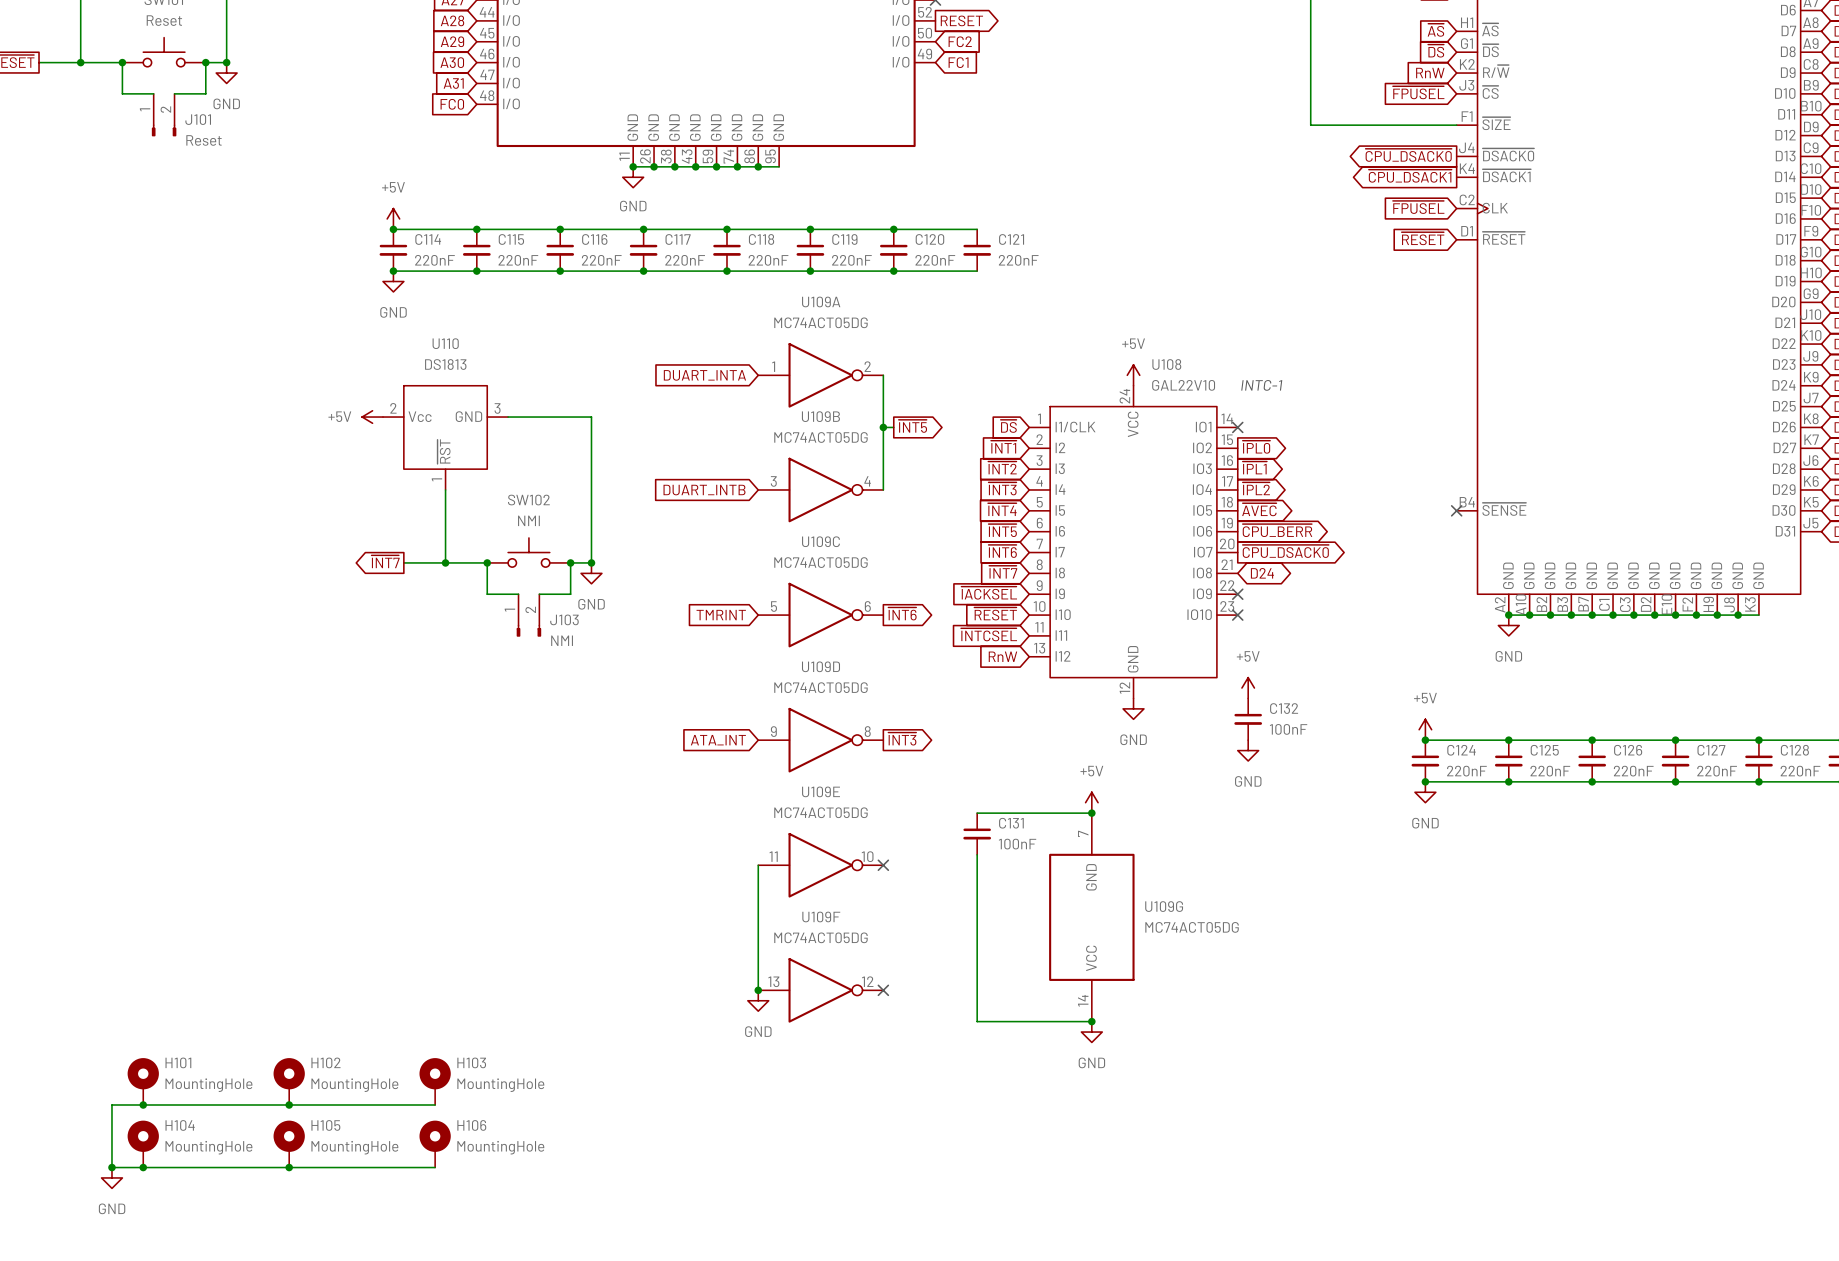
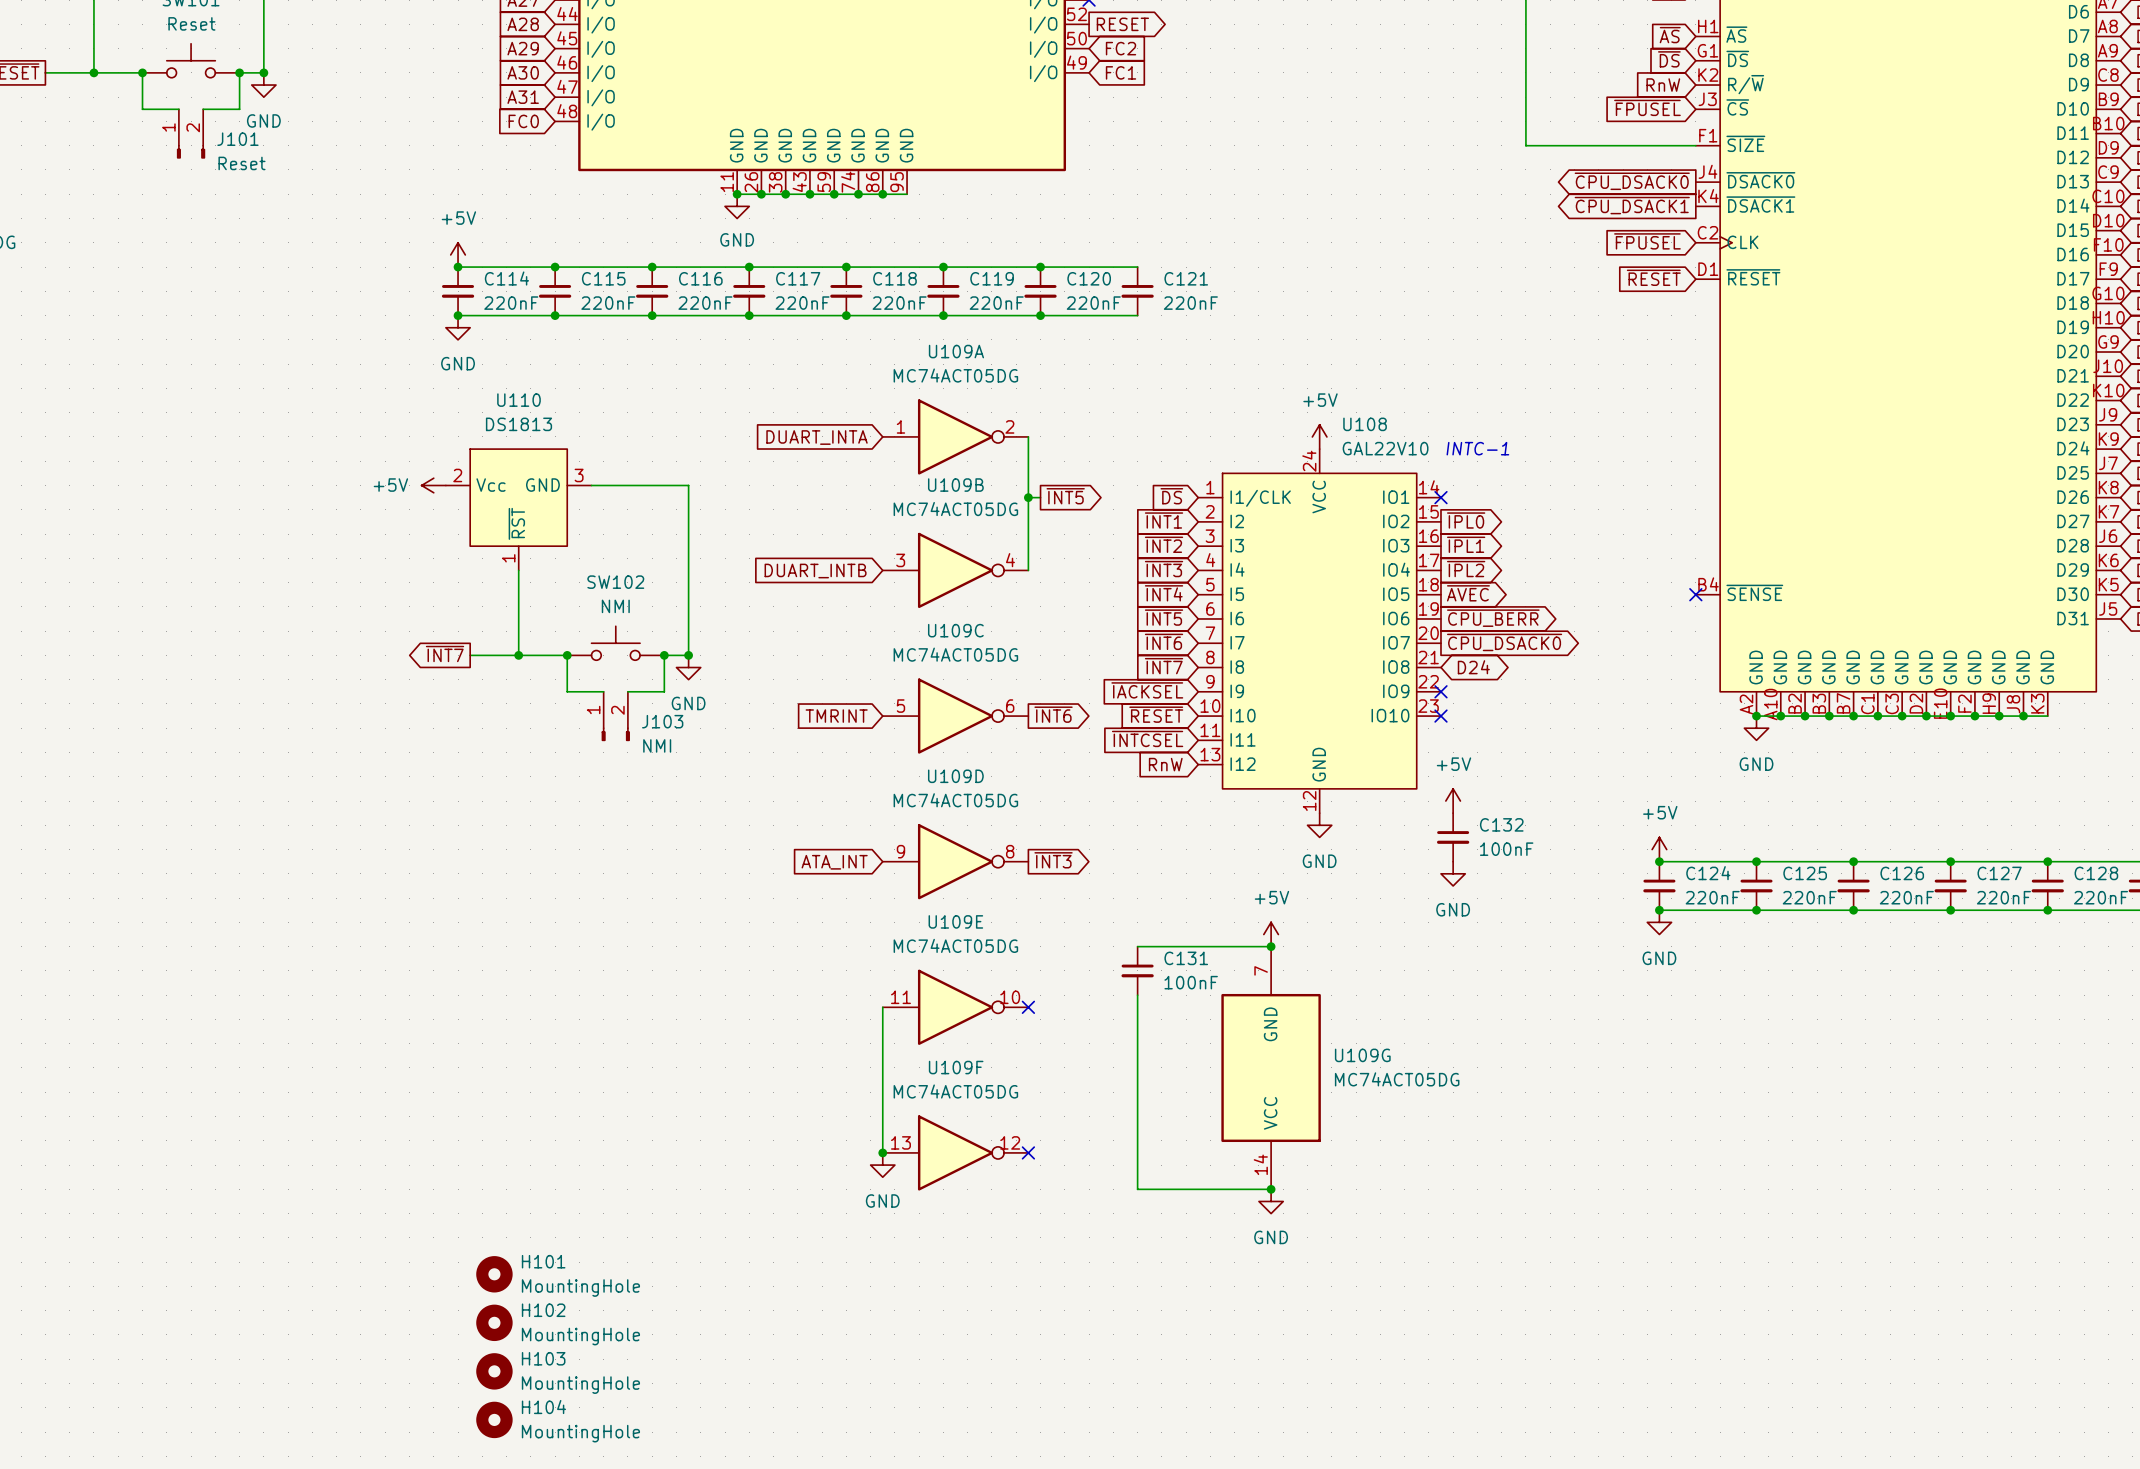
H101 symbol: [127, 1058, 159, 1106] -> [476, 1256, 513, 1293]
H102 symbol: [273, 1058, 305, 1106] -> [476, 1304, 513, 1342]
H103 symbol: [419, 1058, 451, 1106] -> [476, 1353, 513, 1390]
junction: (143, 1105) -> none
junction: (289, 1105) -> none
wire: (435, 1105) (111, 1105) (111, 1167) (435, 1167) -> none
H104 symbol: [127, 1120, 159, 1168] -> [476, 1401, 513, 1439]
H105: MountingHole (289, 1144) -> none
H106: MountingHole (435, 1144) -> none
junction: (111, 1167) -> none
junction: (143, 1167) -> none
junction: (289, 1167) -> none
power symbol: GND (111, 1177) -> none

